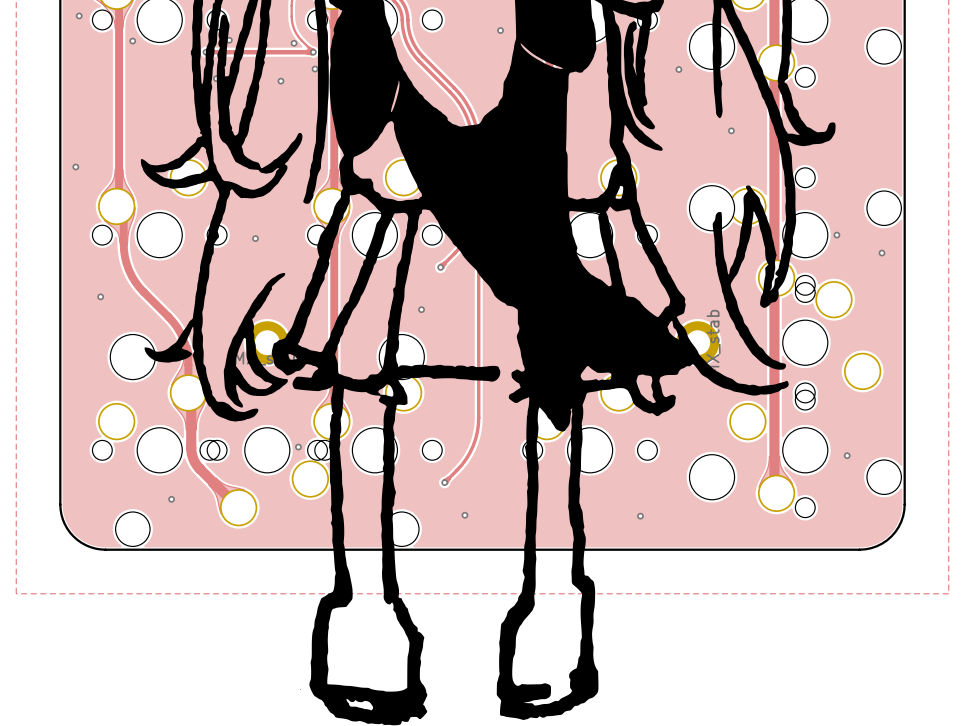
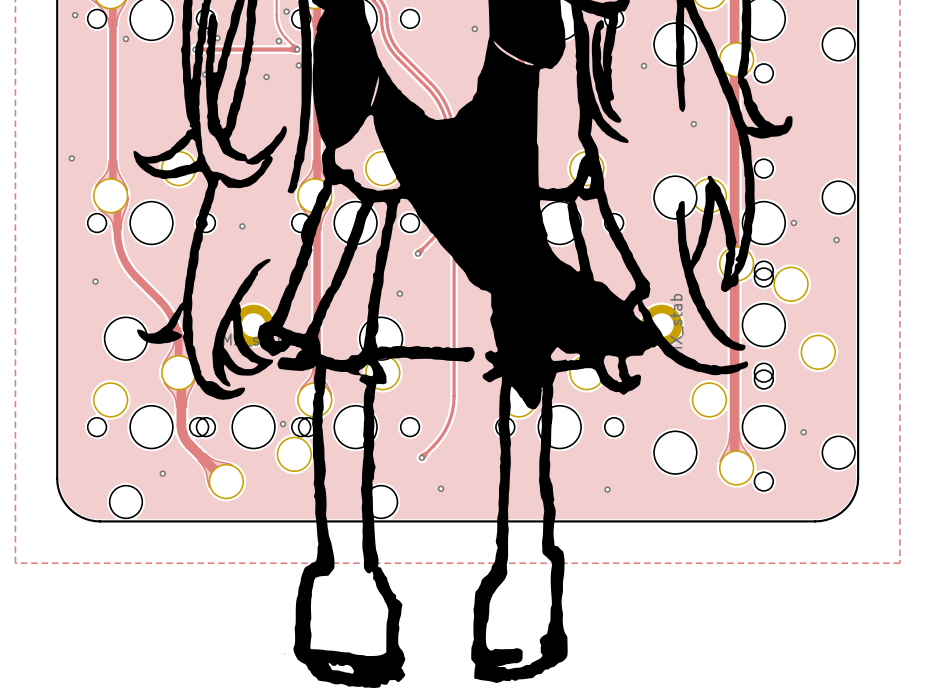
via: none -> (286, 11)

